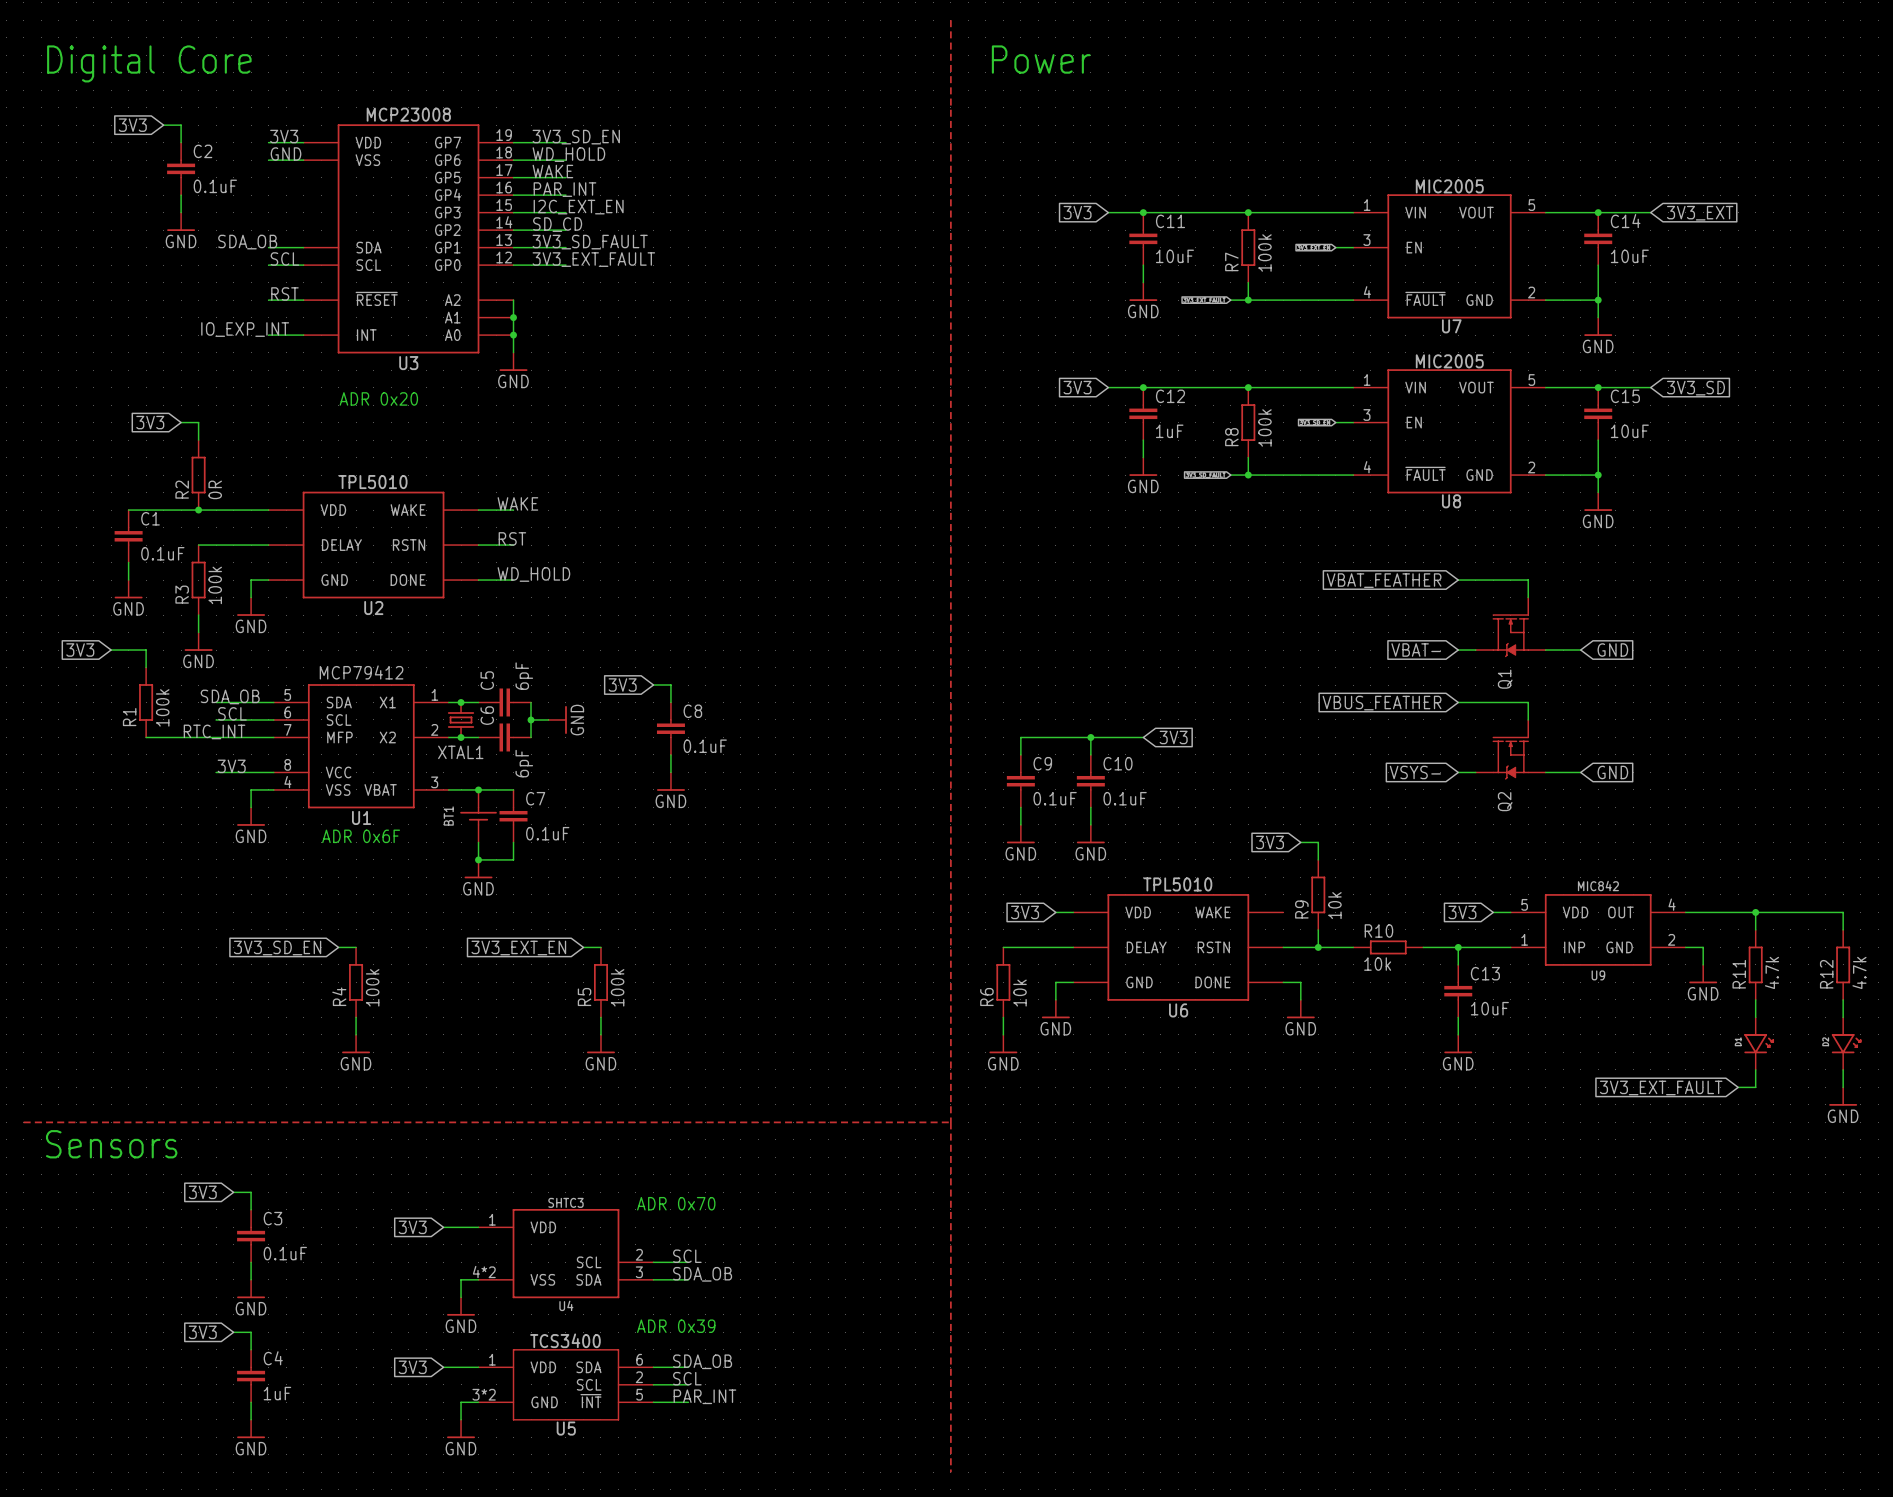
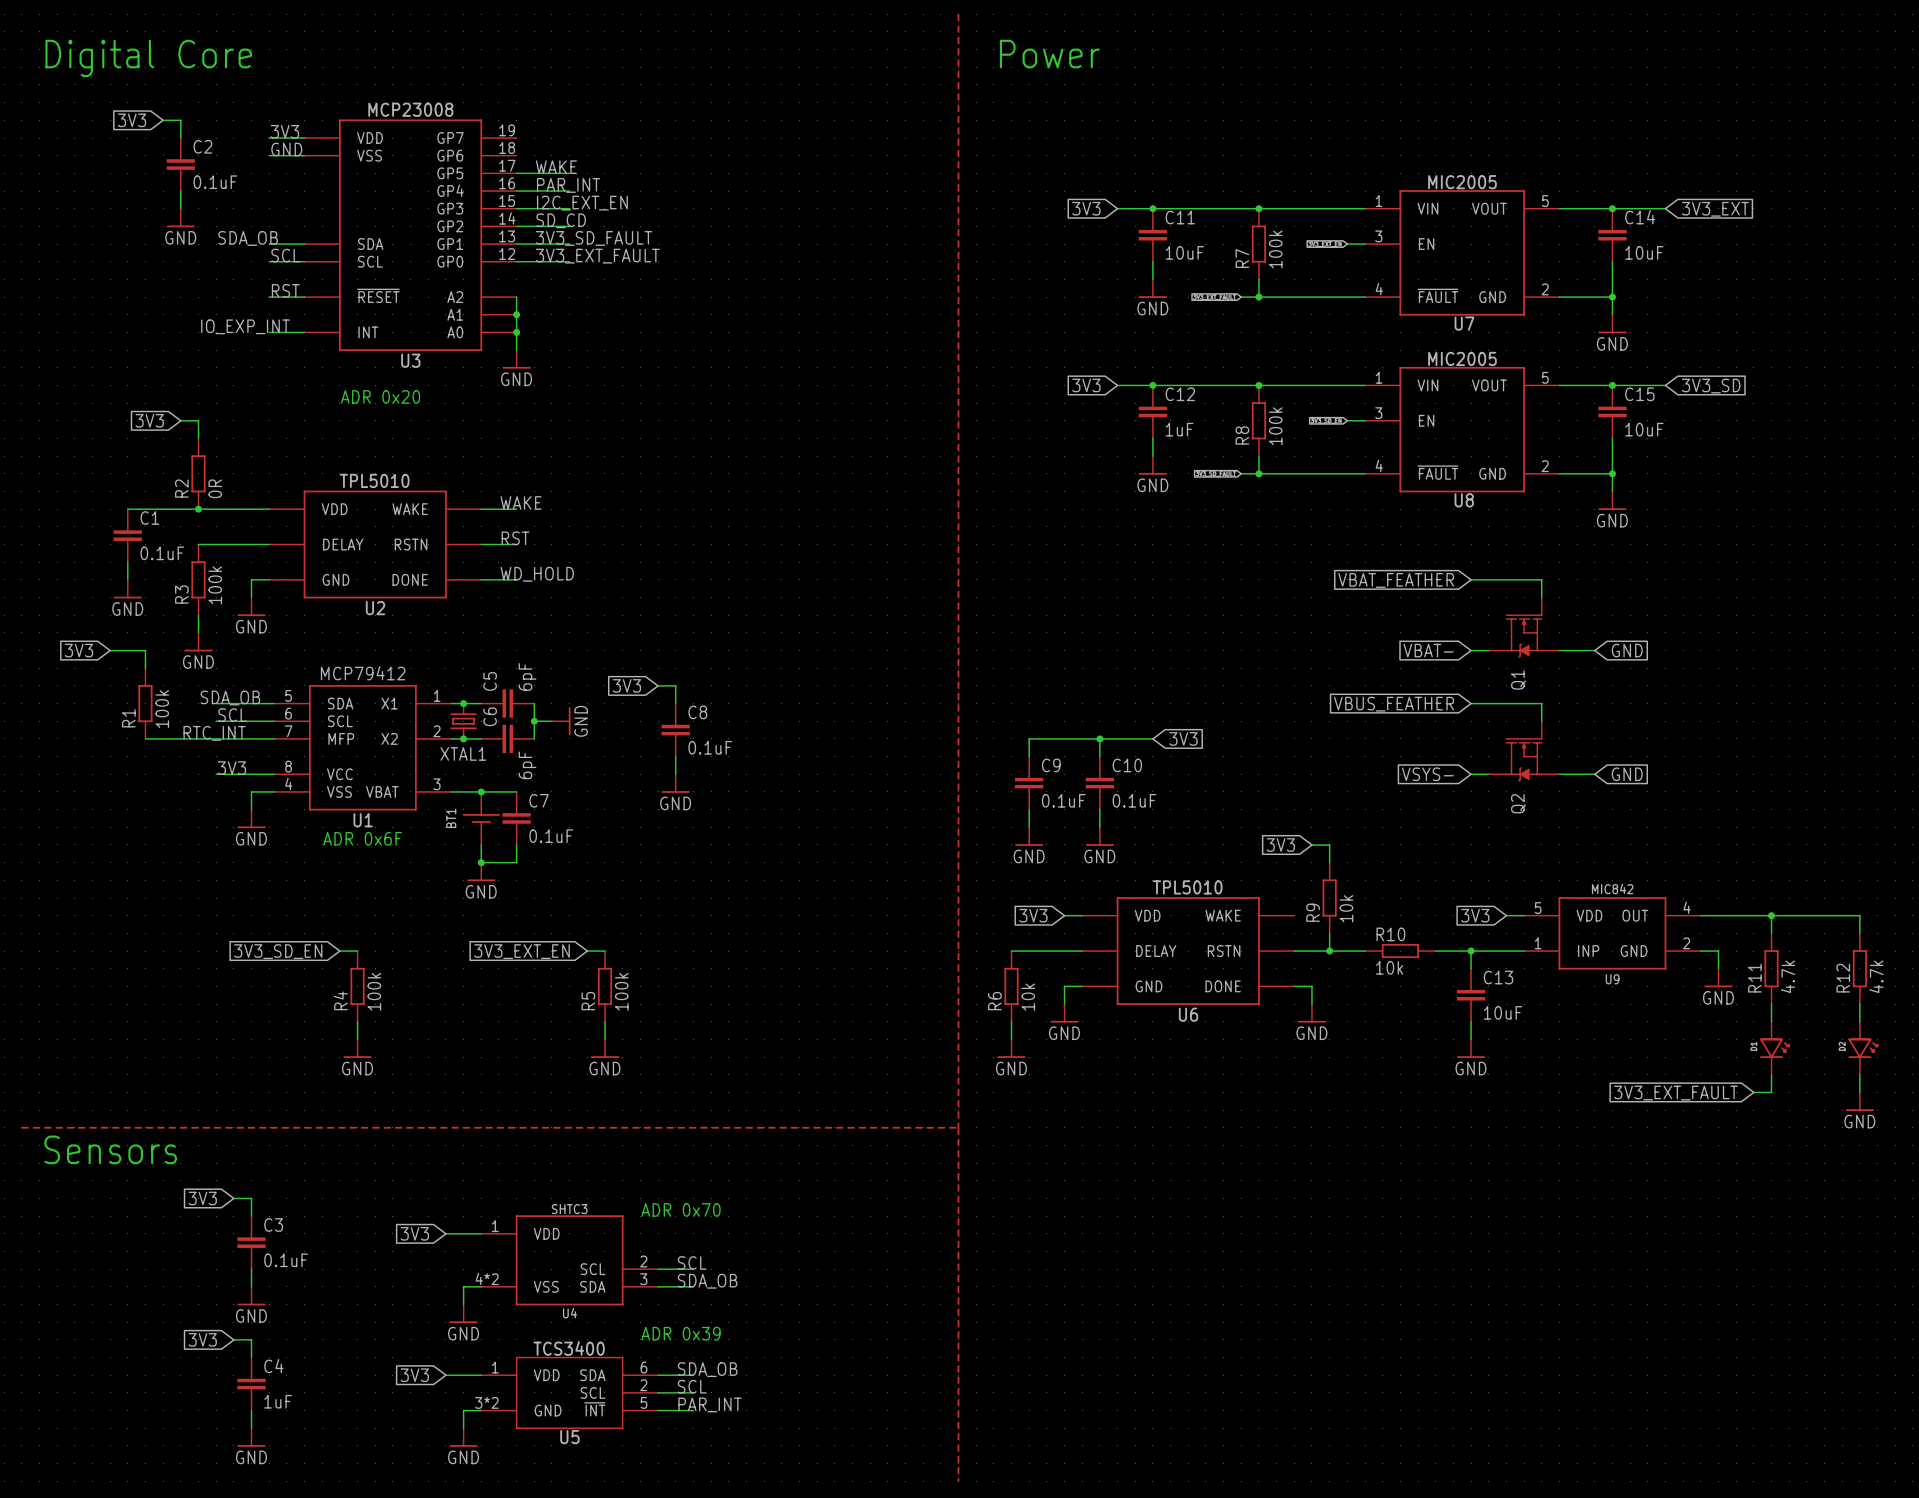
label: 3V3_SD_EN (576, 137) -> none
wire: (513, 142) (565, 142) -> none
label: WD_HOLD (568, 154) -> none
wire: (513, 160) (565, 160) -> none

